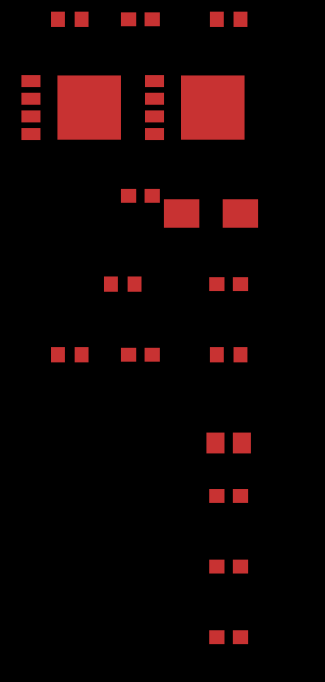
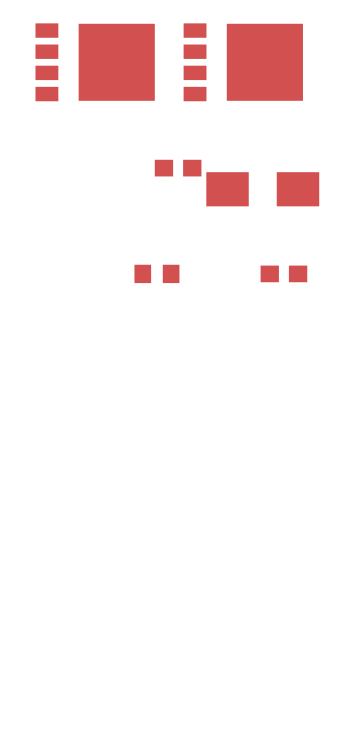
part: (69, 354) -> none
part: (140, 354) -> none
part: (228, 354) -> none
part: (228, 442) -> none
part: (228, 495) -> none
part: (228, 566) -> none
part: (228, 637) -> none

